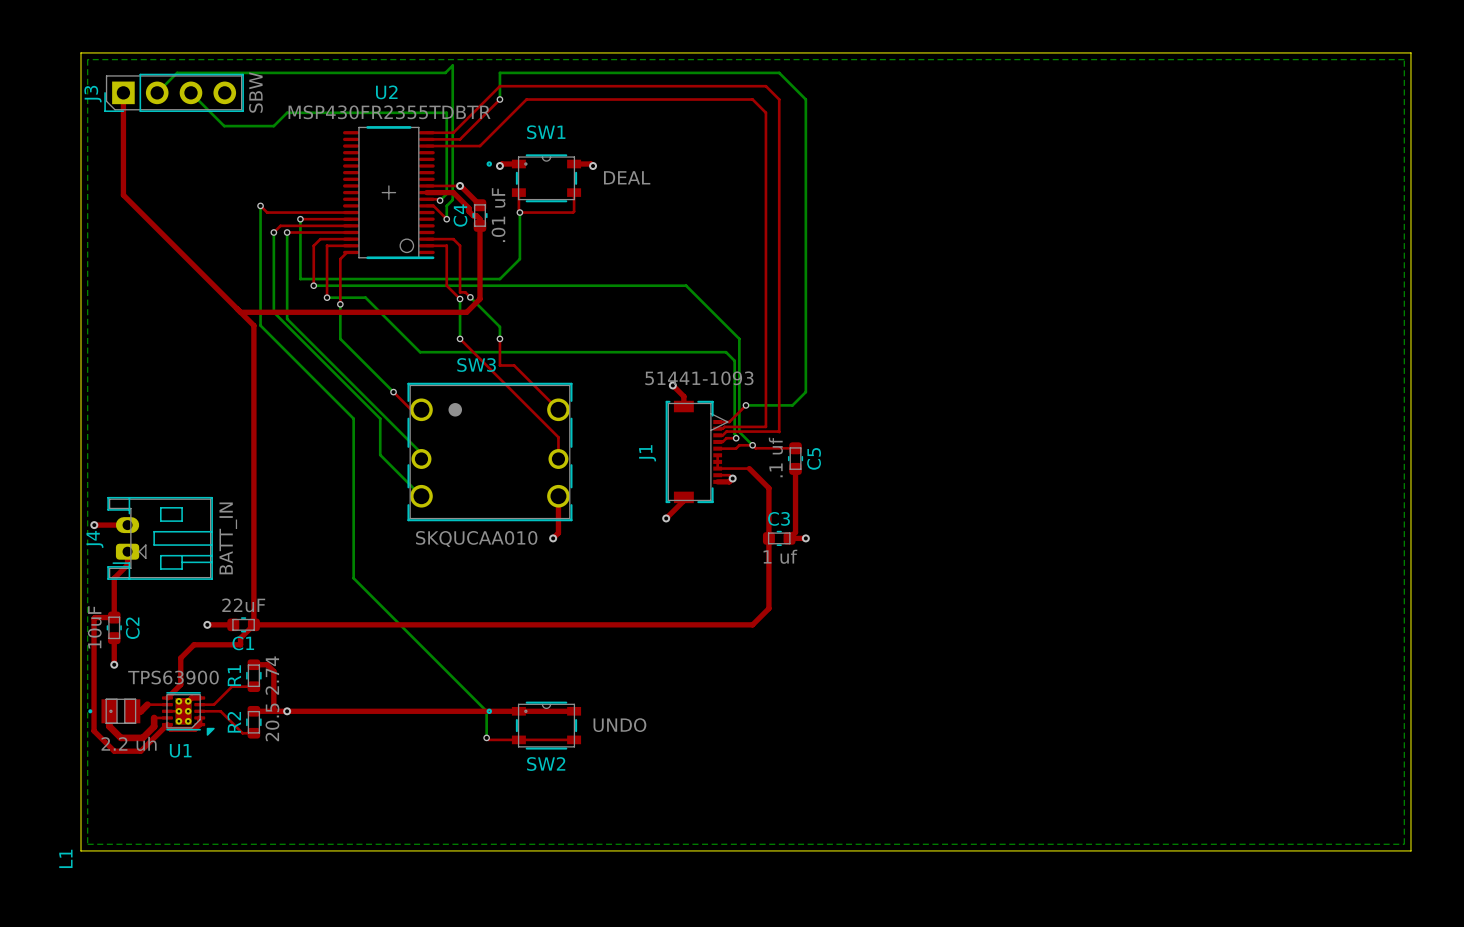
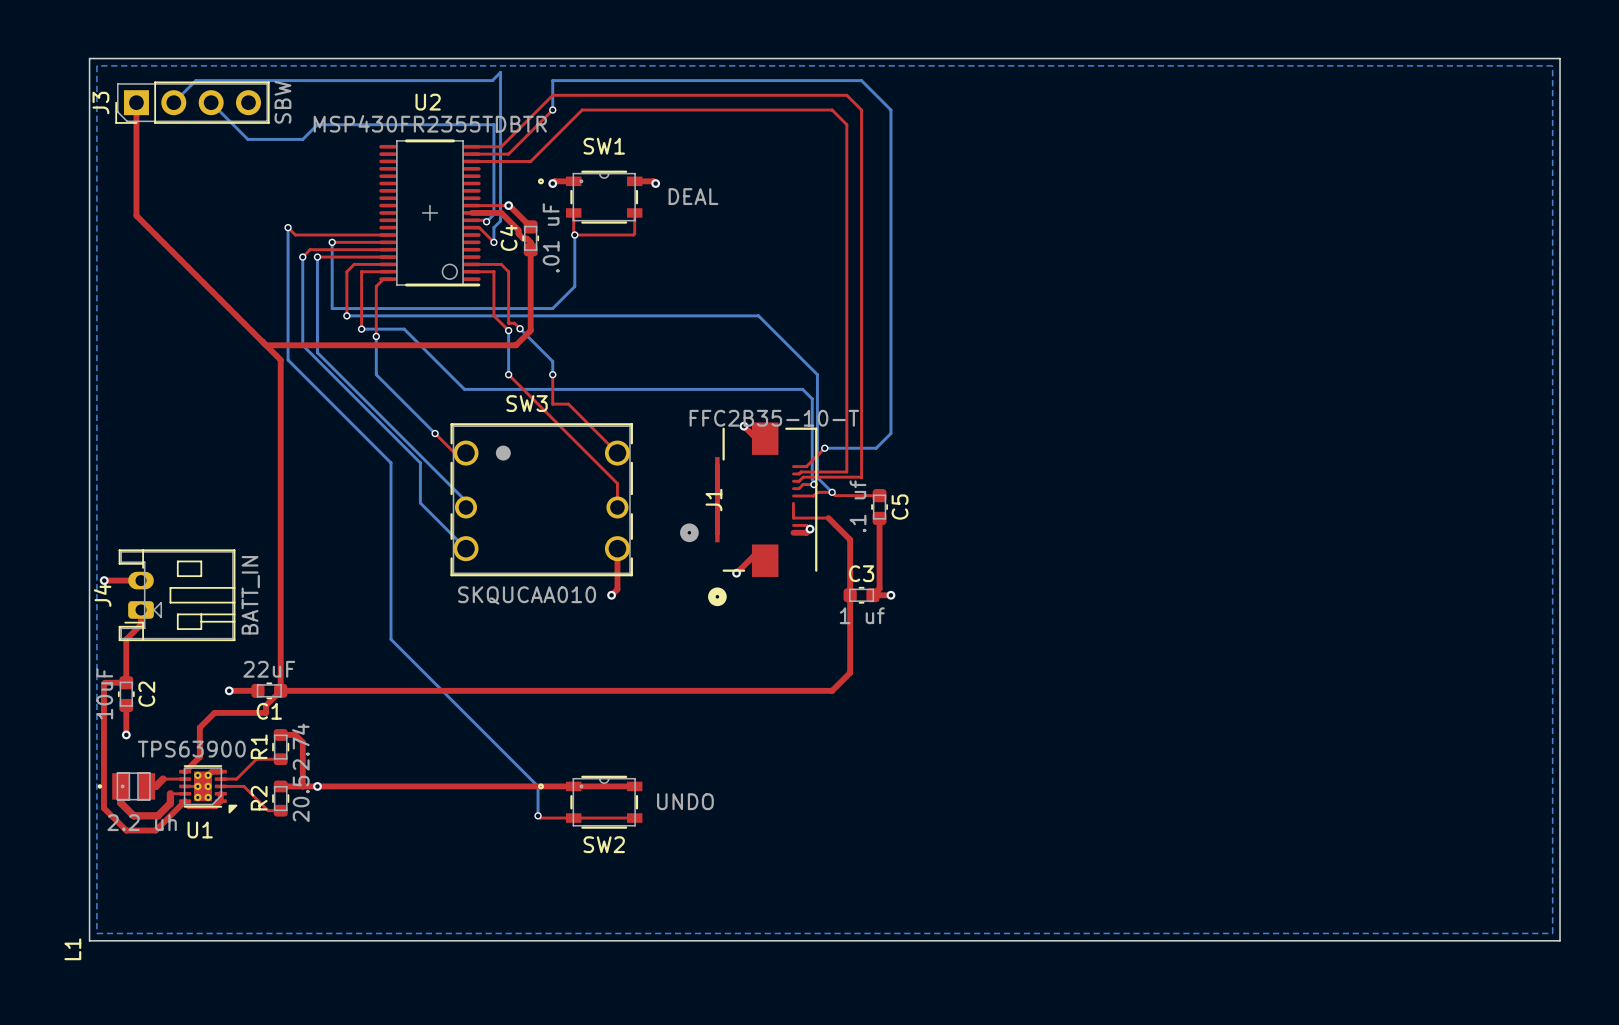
J1 value: 51441-1093 (699, 378) -> FFC2B35-10-T (774, 418)
J1 footprint: [665, 400, 728, 504] -> [680, 422, 818, 607]

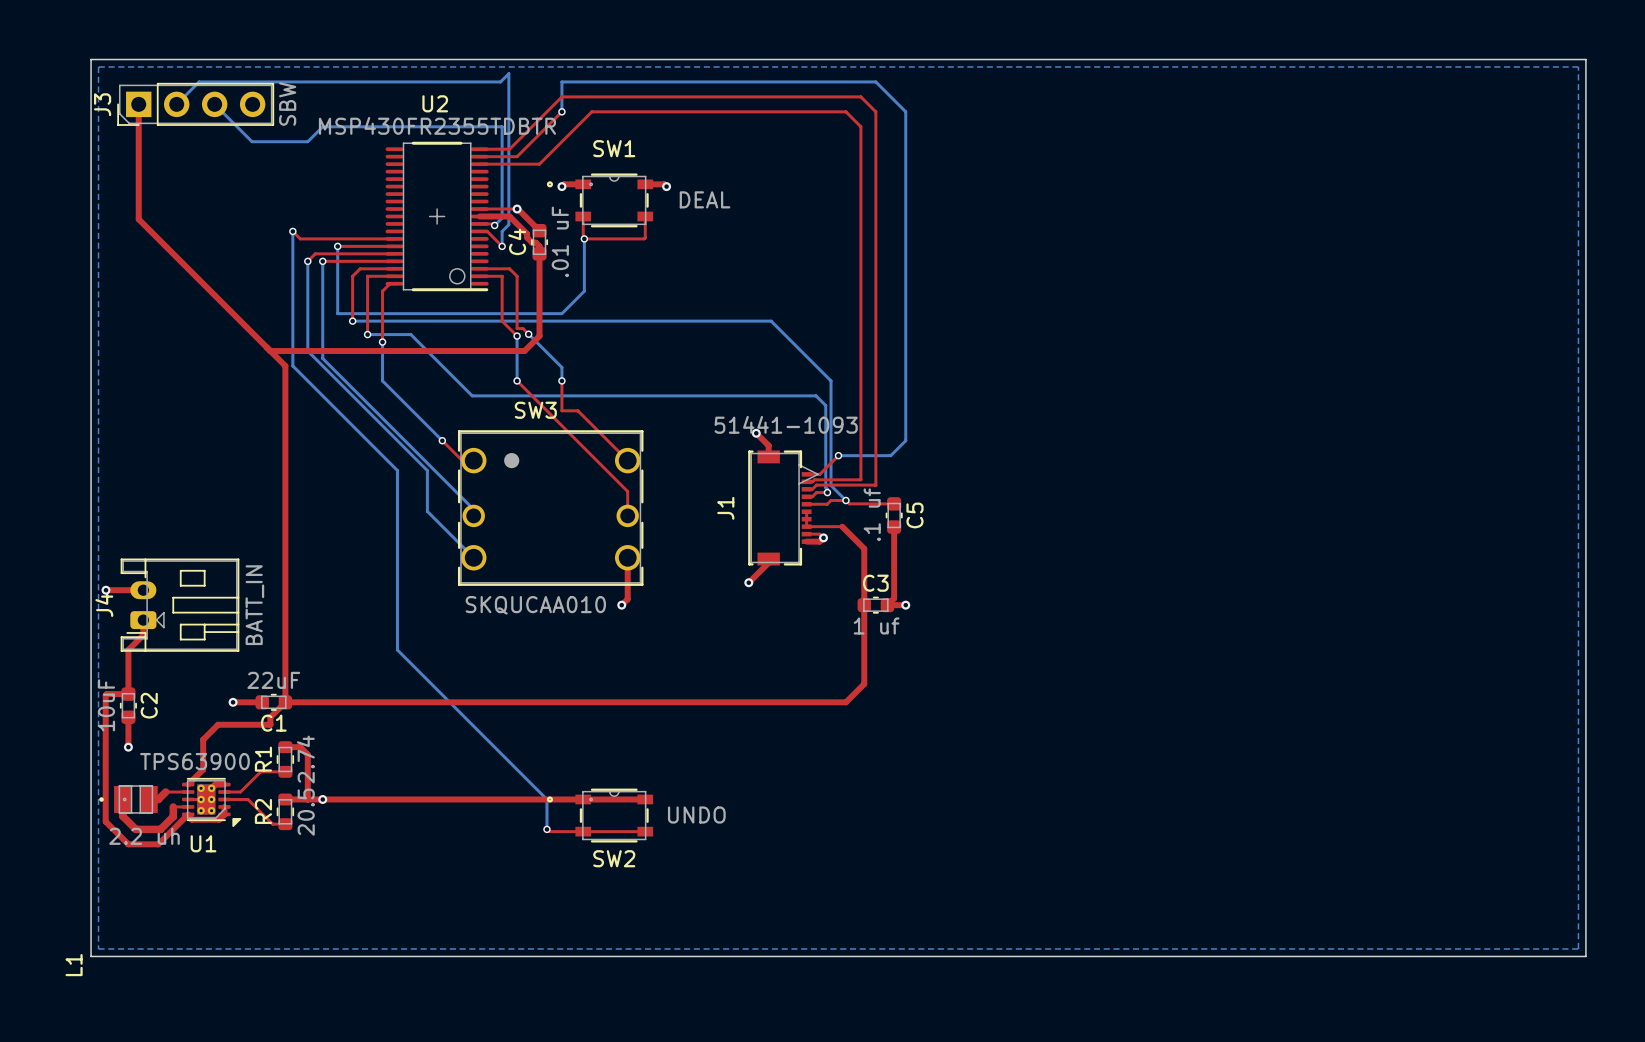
J1 value: FFC2B35-10-T (774, 418) -> 51441-1093 (786, 424)
J1 footprint: [680, 422, 818, 607] -> [748, 450, 819, 566]

